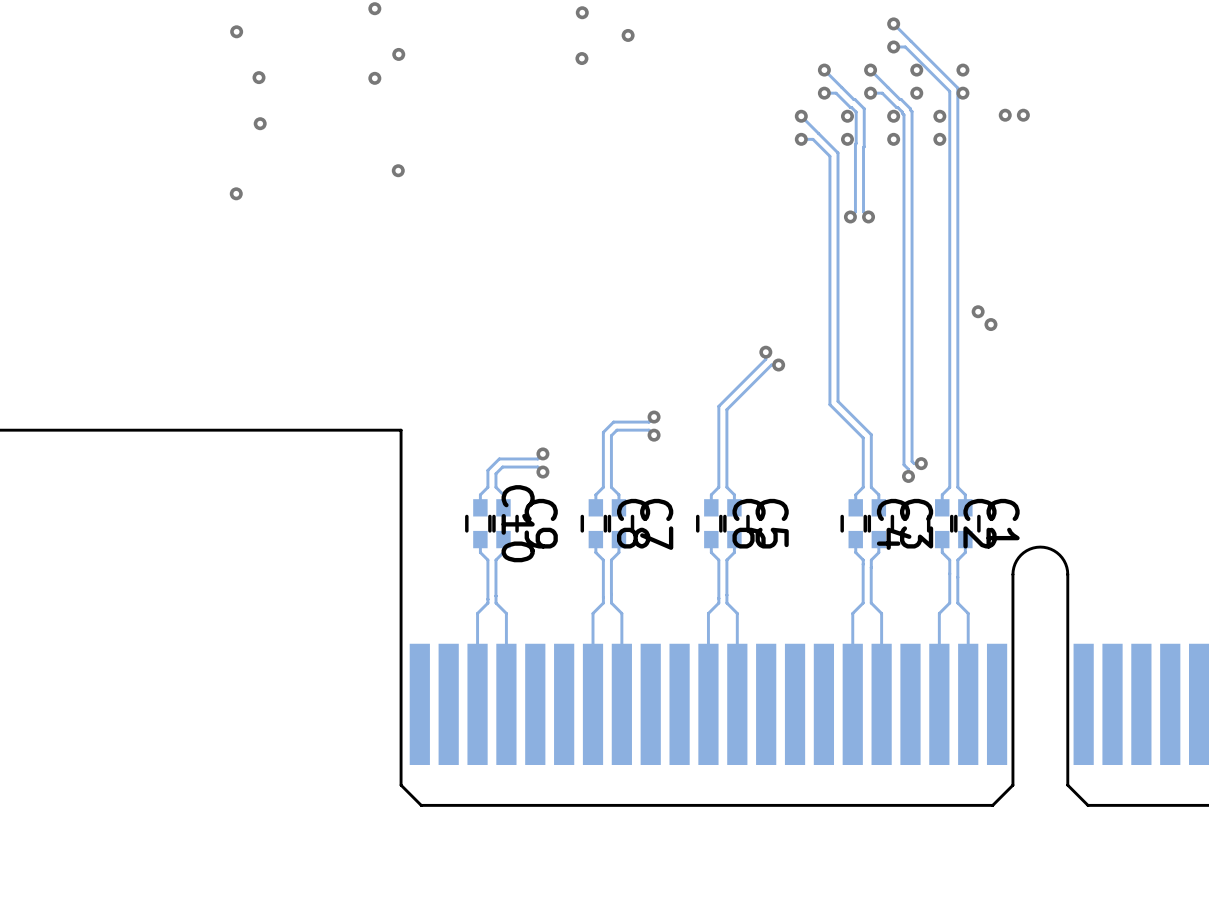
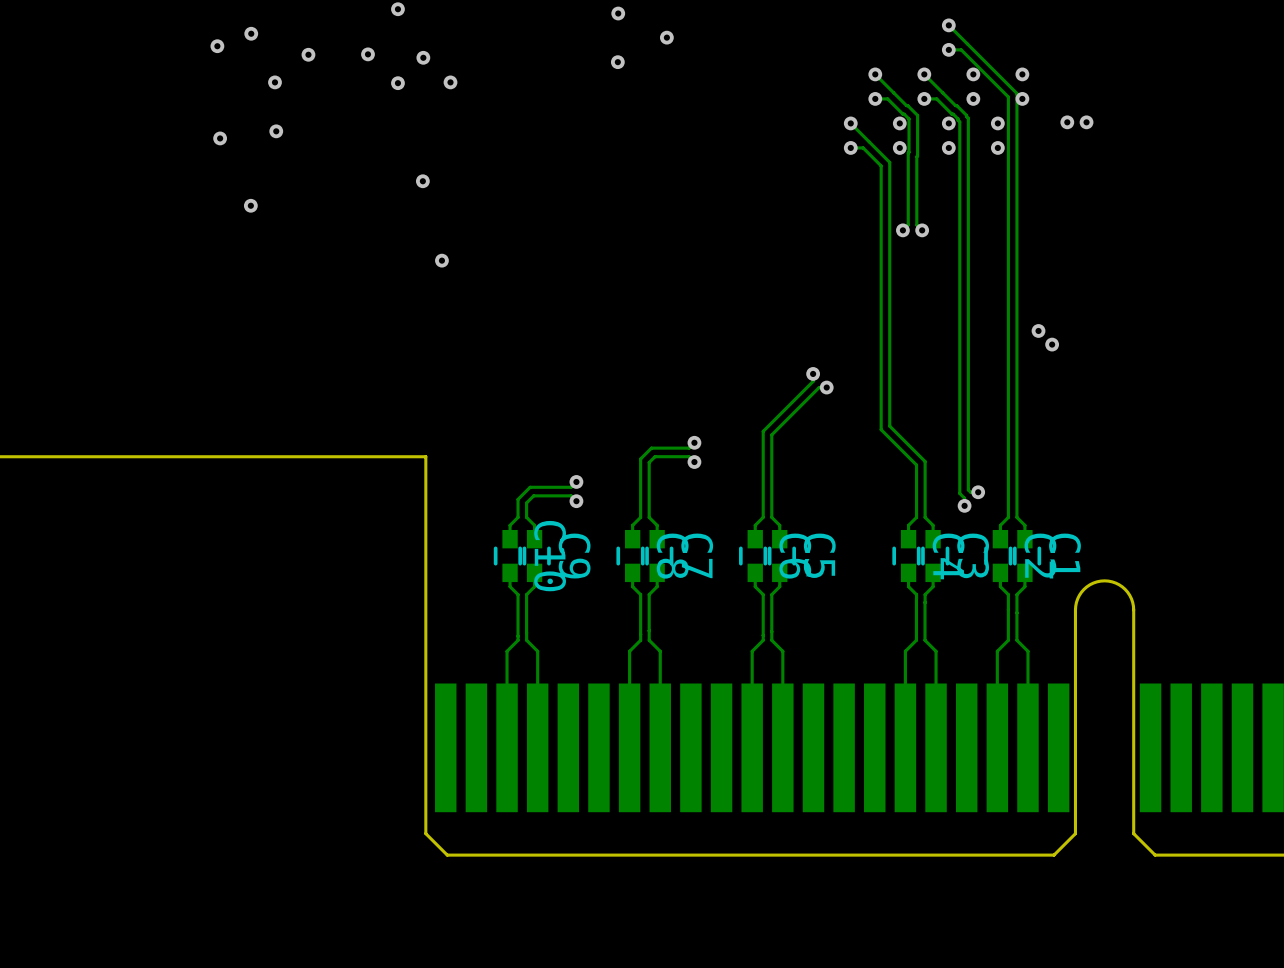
via: none -> (217, 46)
via: none -> (308, 54)
via: none -> (368, 54)
via: none -> (450, 82)
via: none -> (220, 138)
via: none -> (441, 260)

